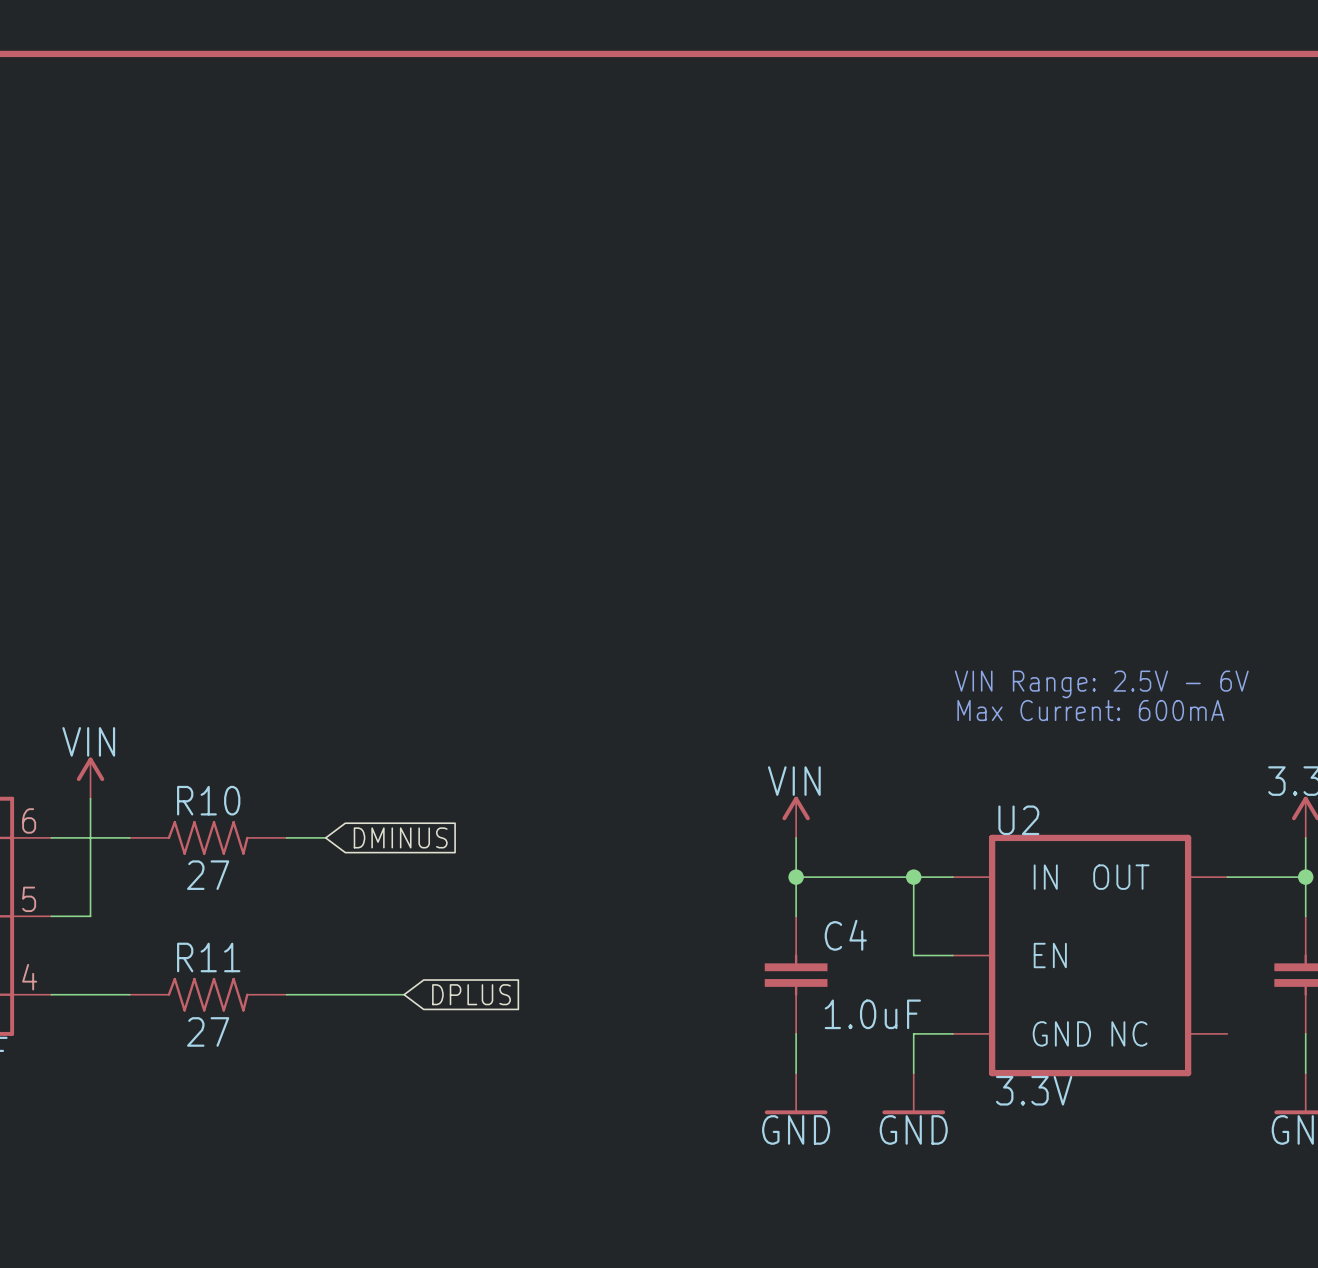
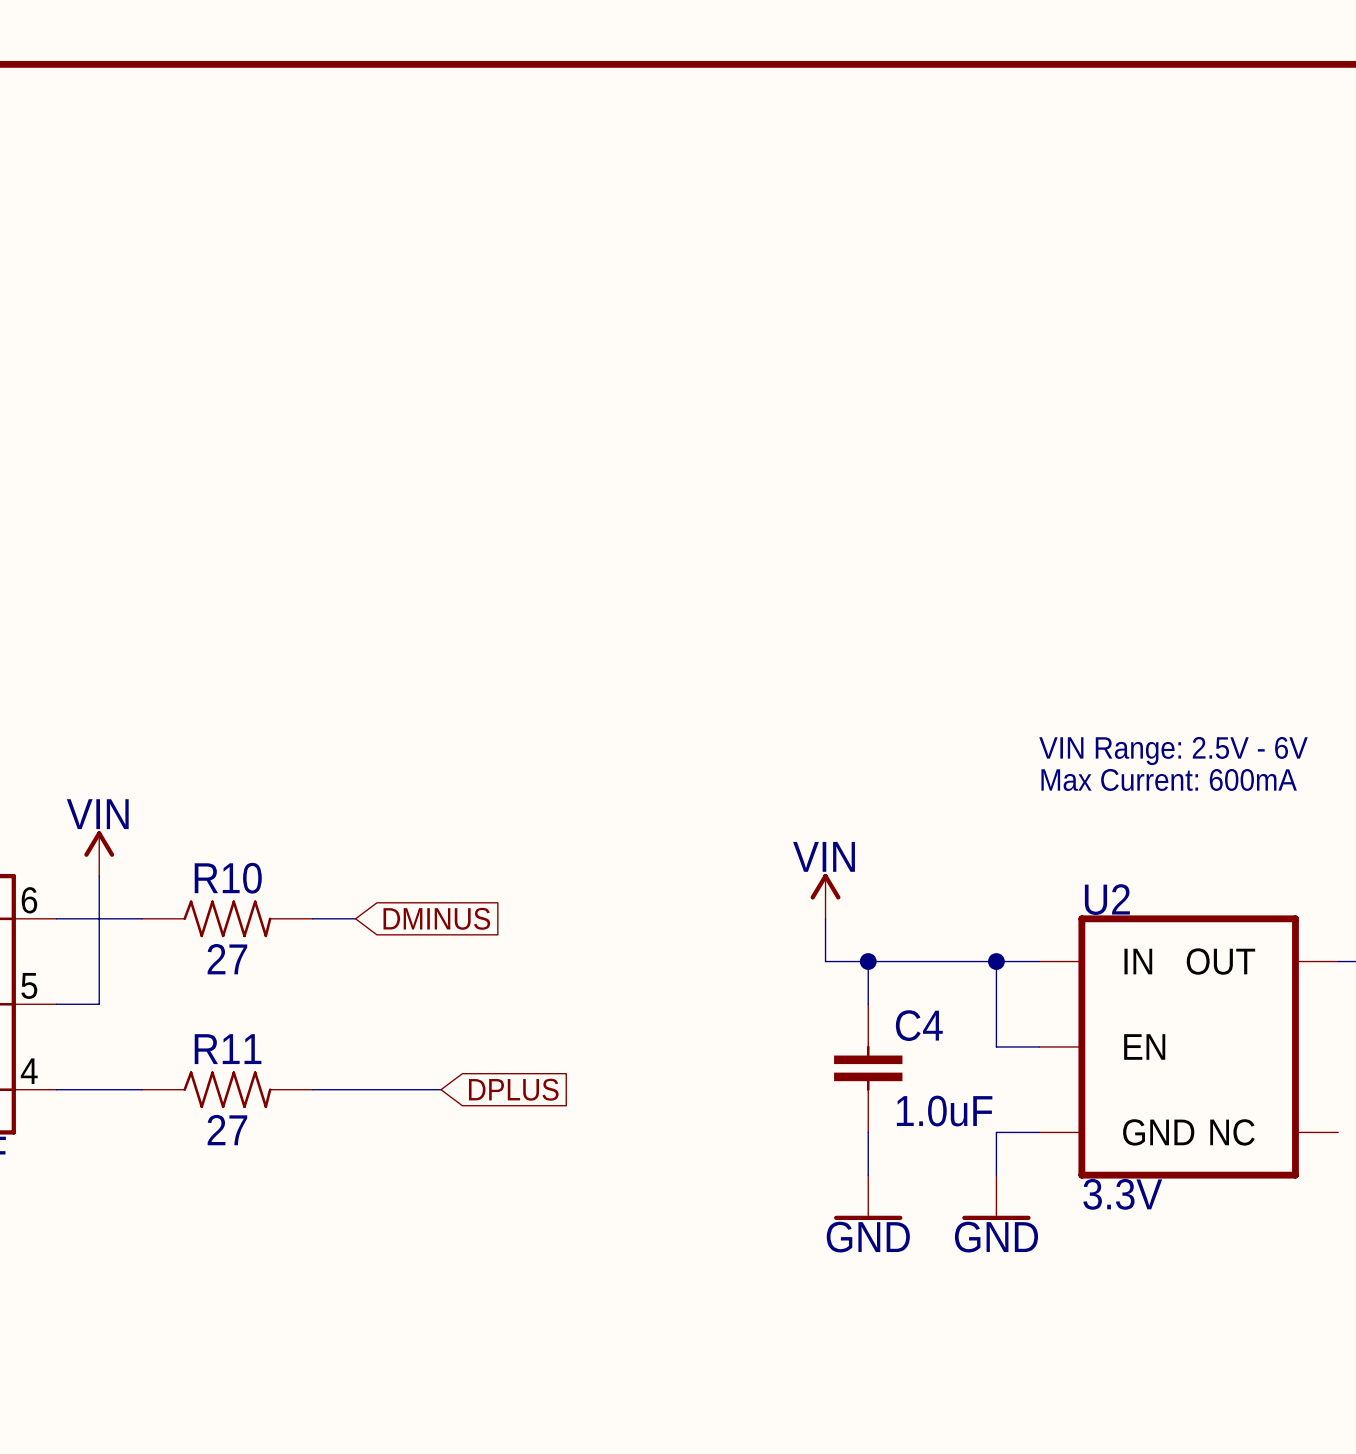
power symbol position: VIN (796, 817) -> VIN (825, 896)
wire: (796, 837) (796, 877) -> (825, 918) (825, 961) (868, 961)

